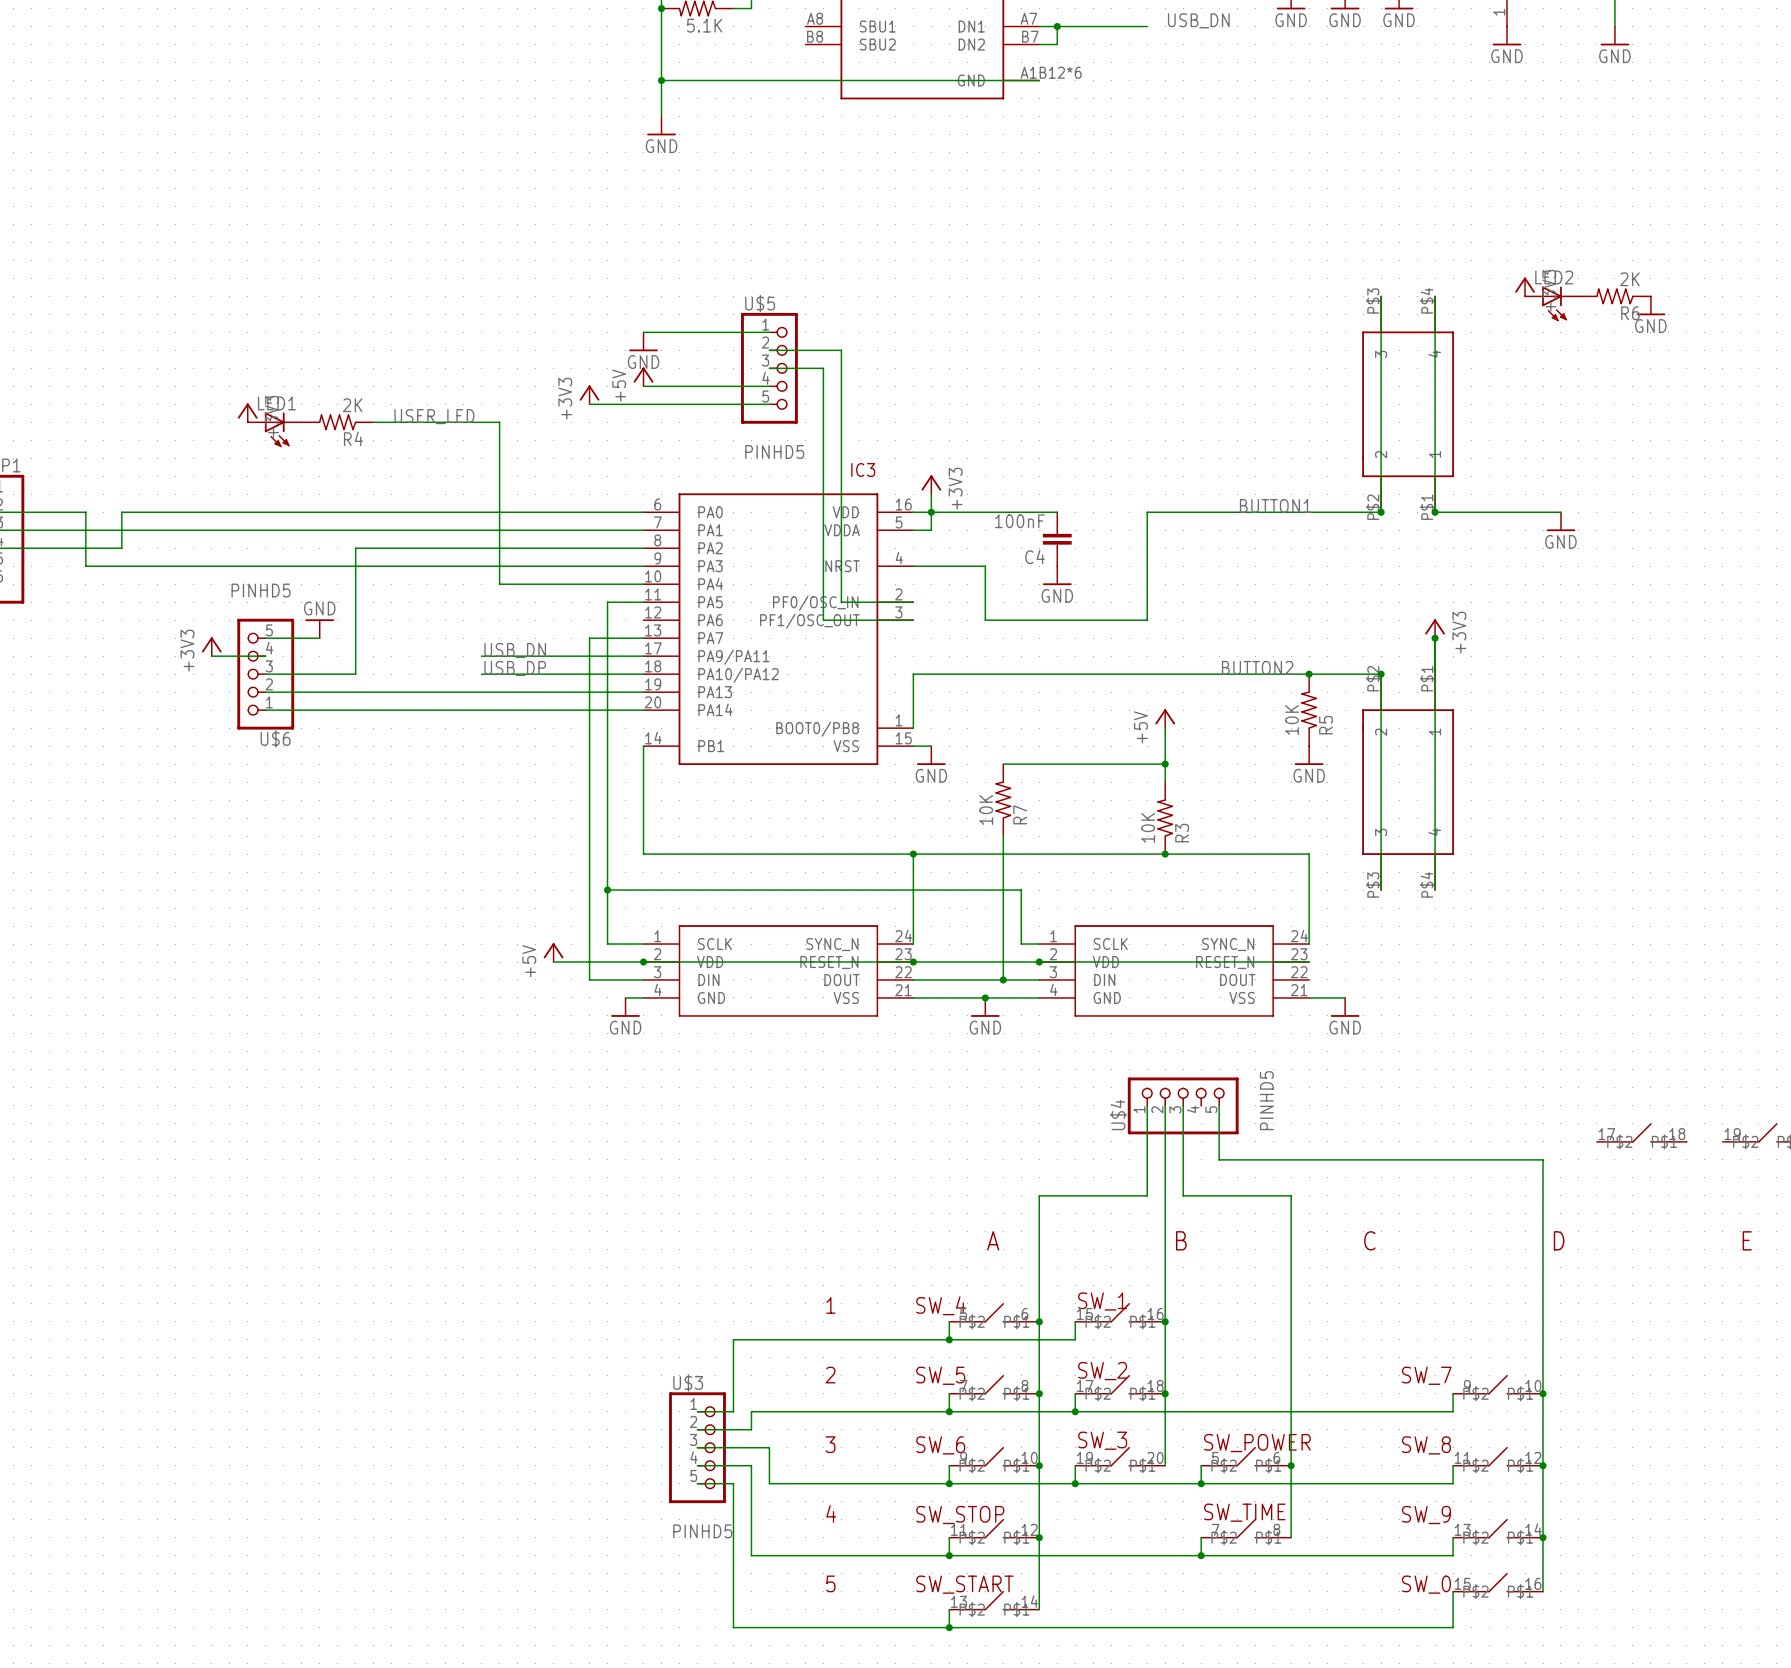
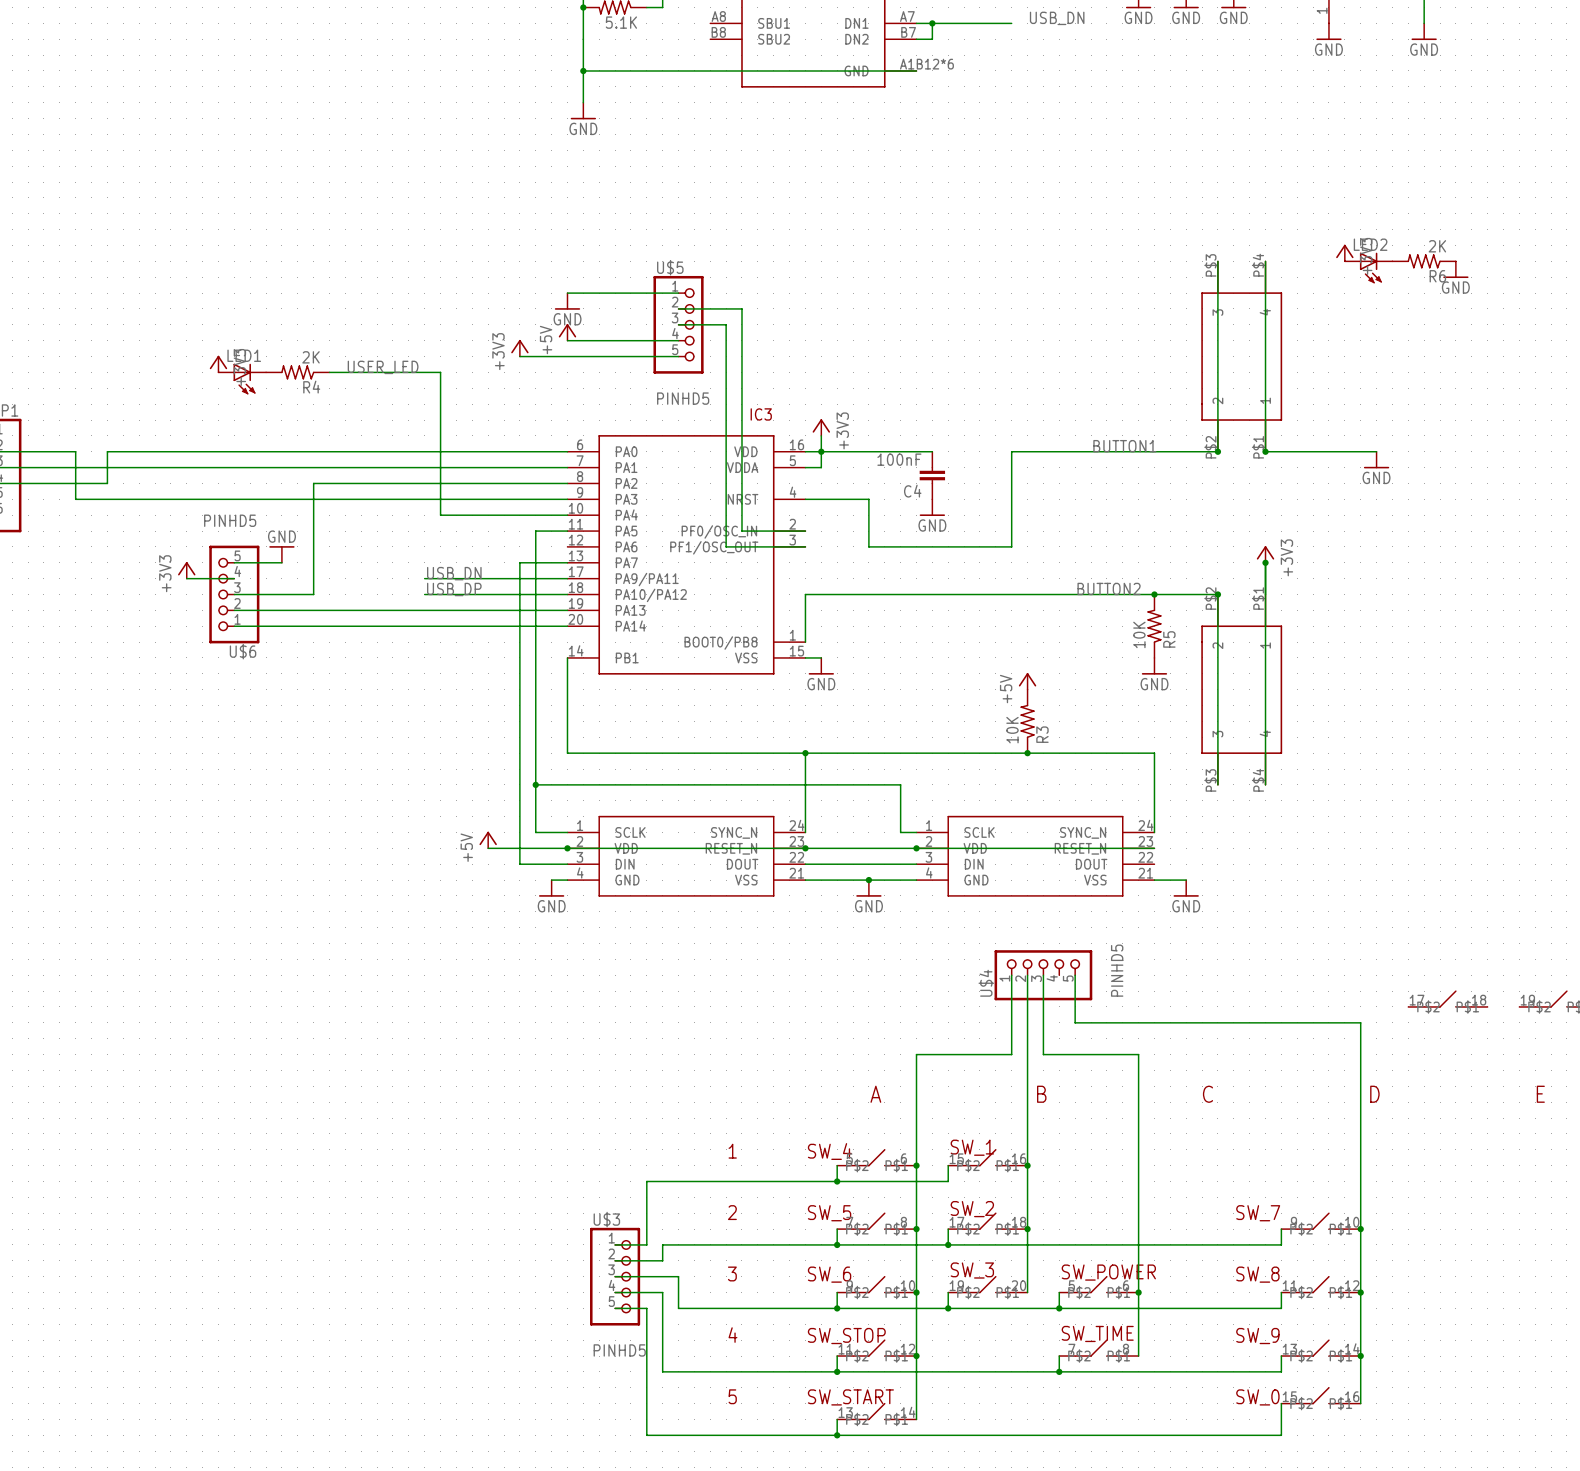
power symbol position: +5V (1165, 718) -> +5V (1027, 681)
wire: (1165, 728) (1165, 782) -> none
wire: (1003, 764) (1165, 764) -> none
junction: (1165, 764) -> none
R7: 10K (1003, 800) -> none
wire: (1003, 836) (1003, 979) -> none
junction: (1003, 979) -> none

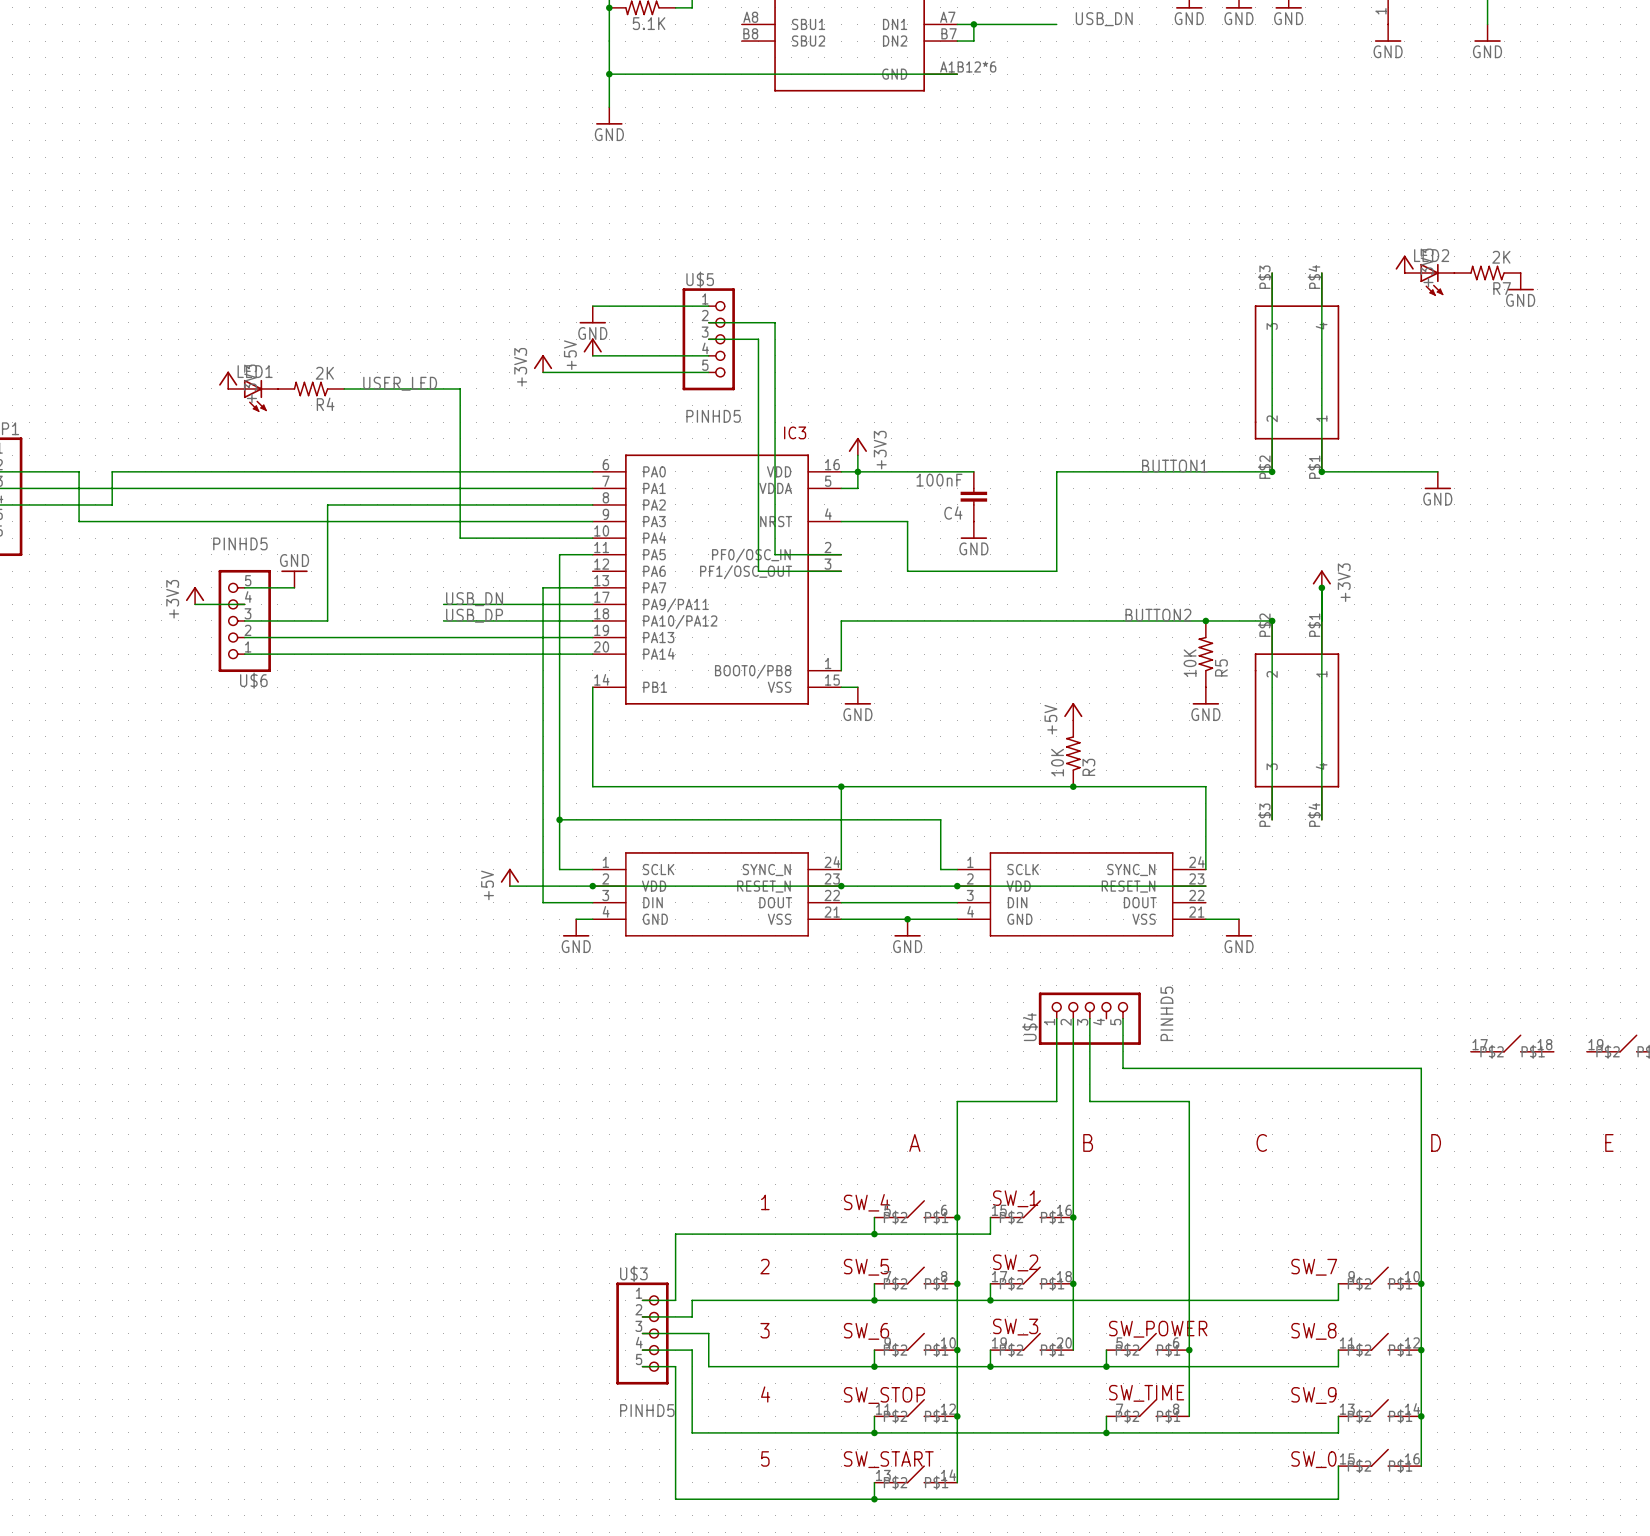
R6 name: R6 (1437, 276) -> R7 (1502, 288)

